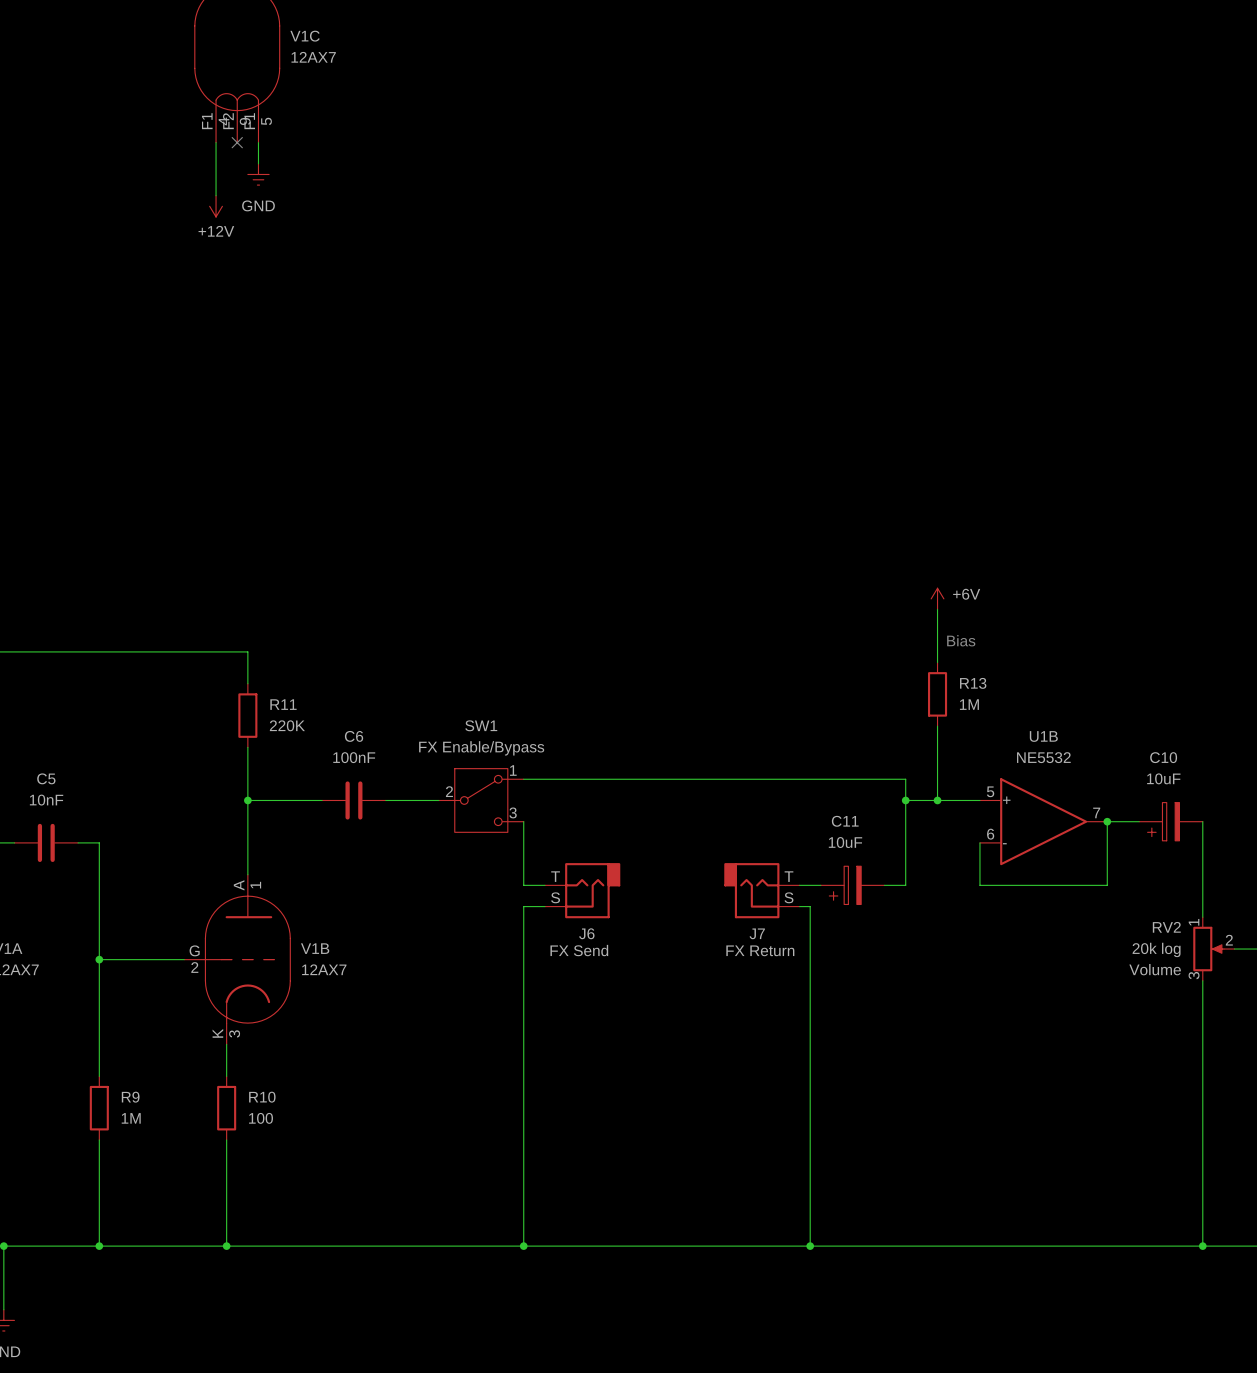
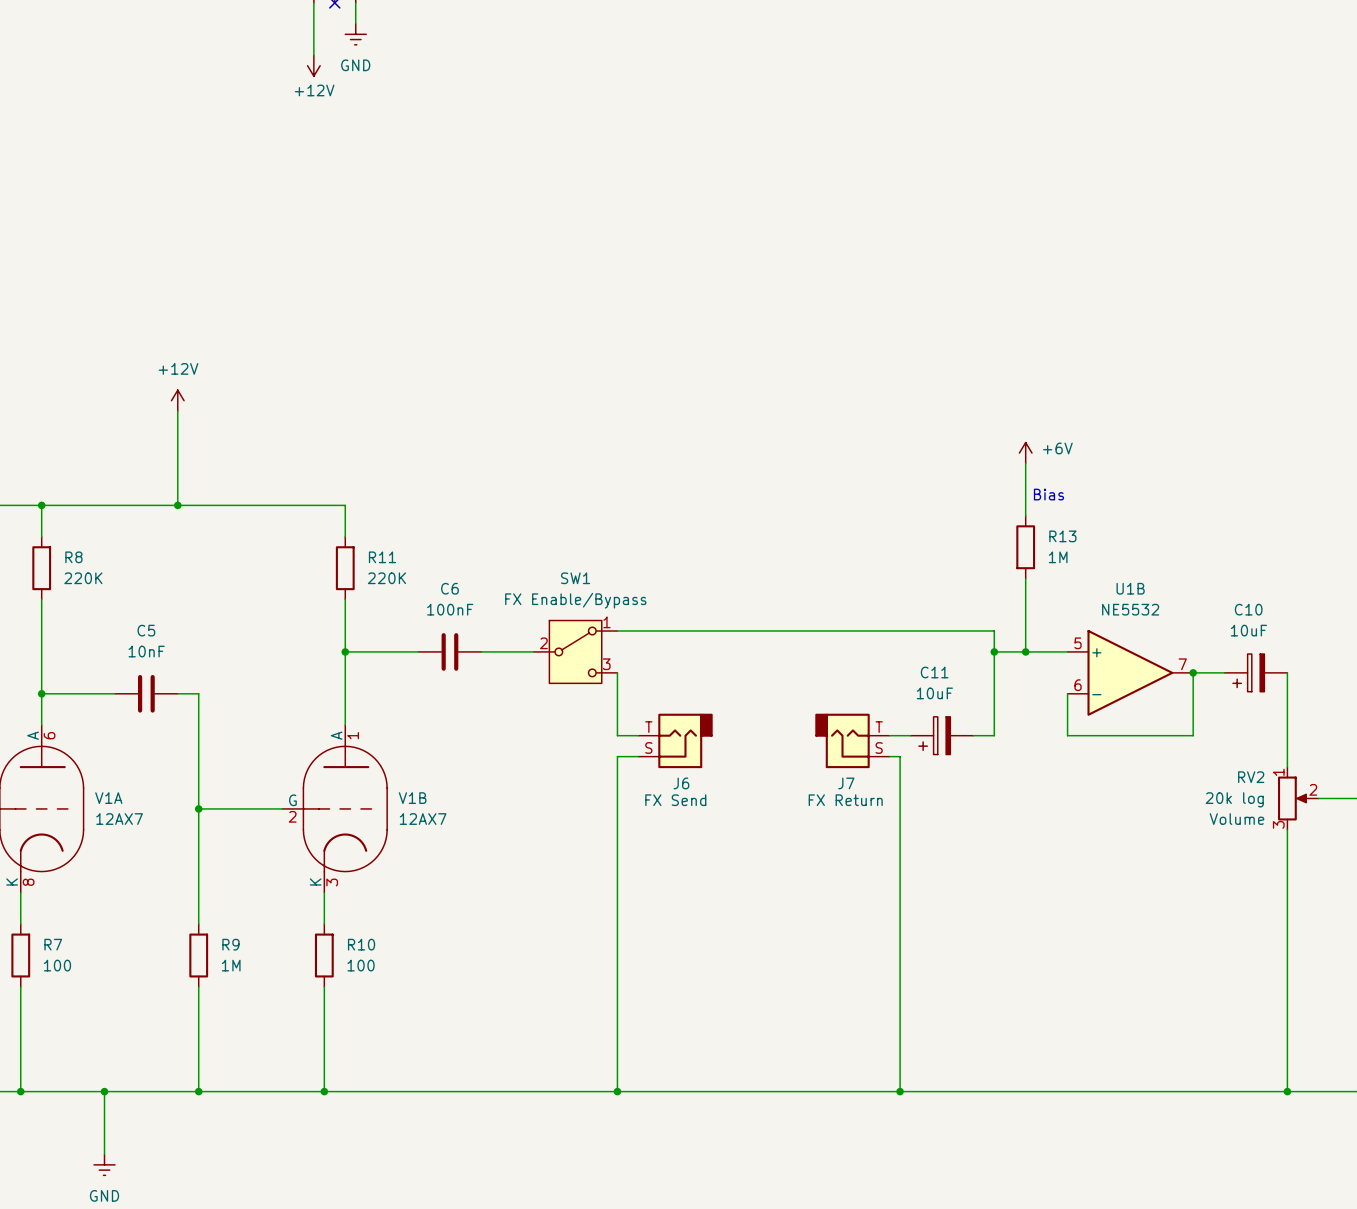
power symbol: none -> +12V (177, 400)
wire: none -> (177, 411) (177, 505)
junction: none -> (177, 505)

